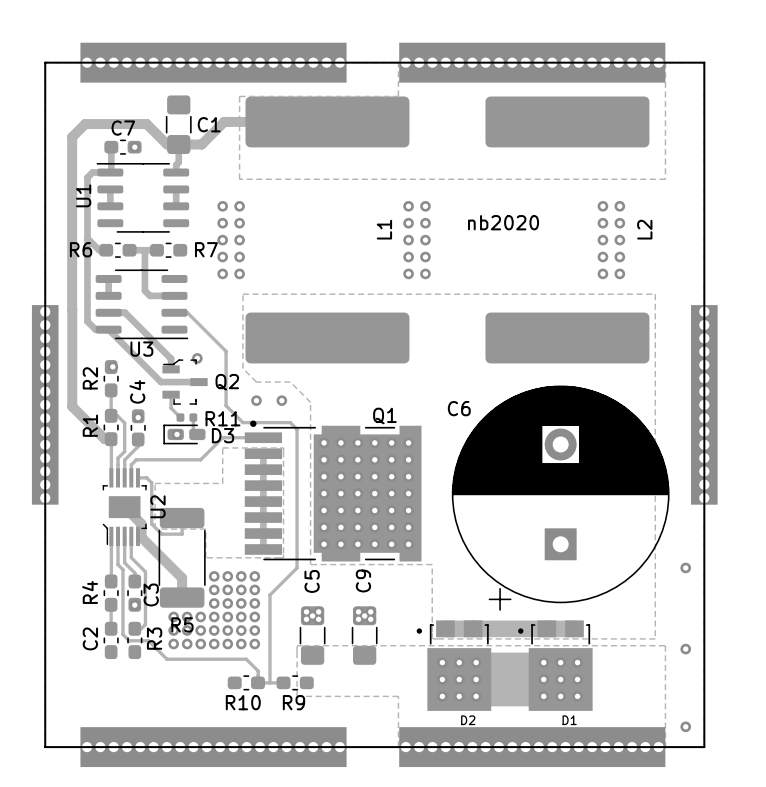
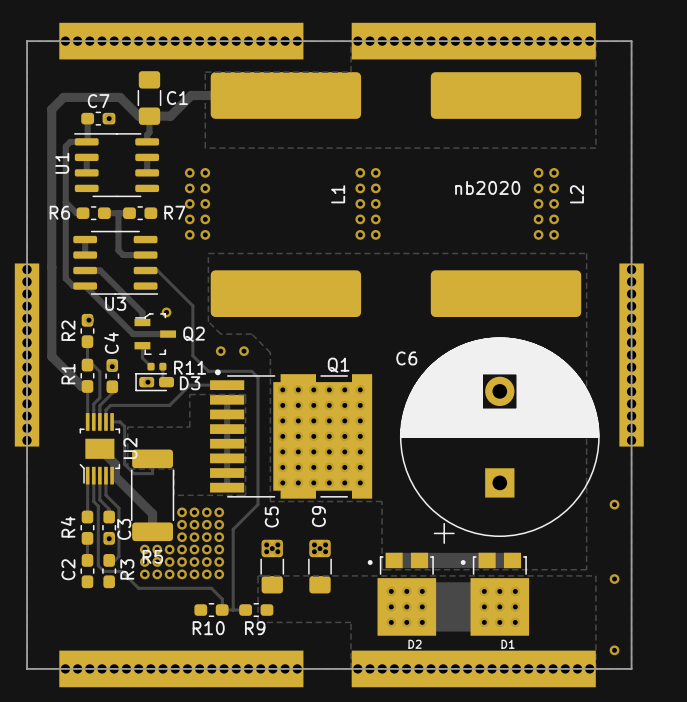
text position: nb2020 (503, 222) -> nb2020 (487, 187)

